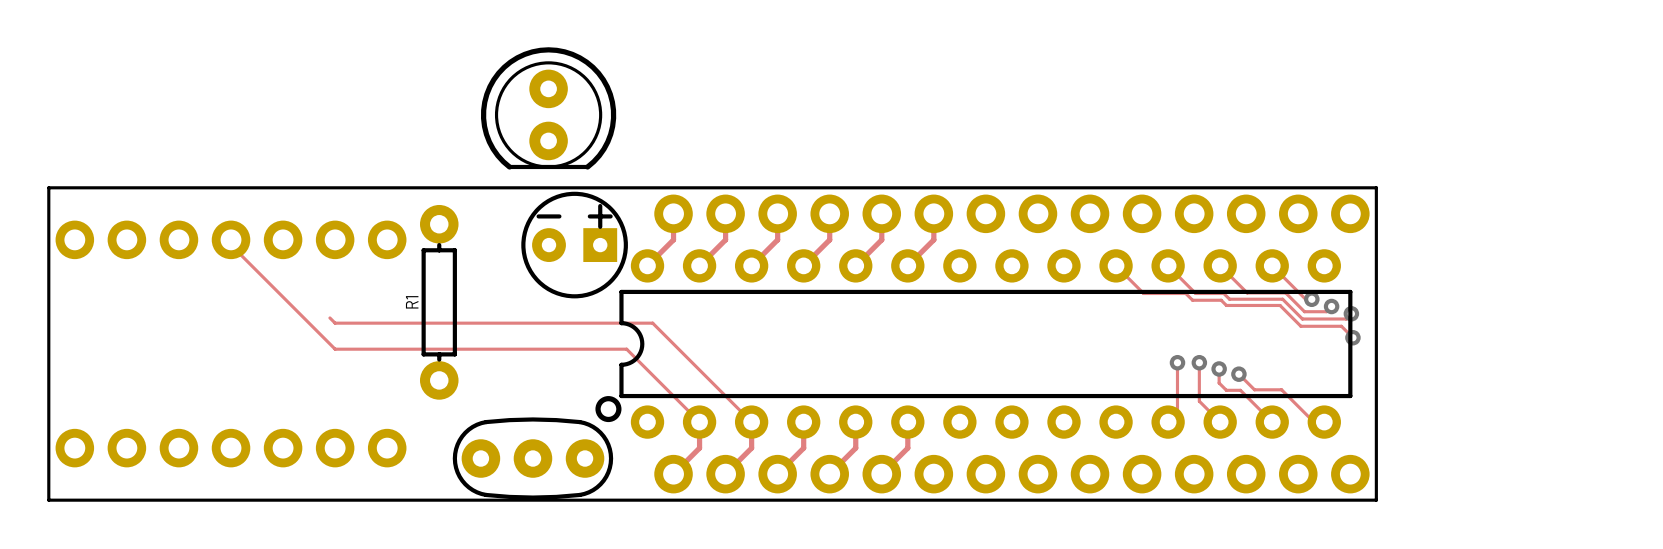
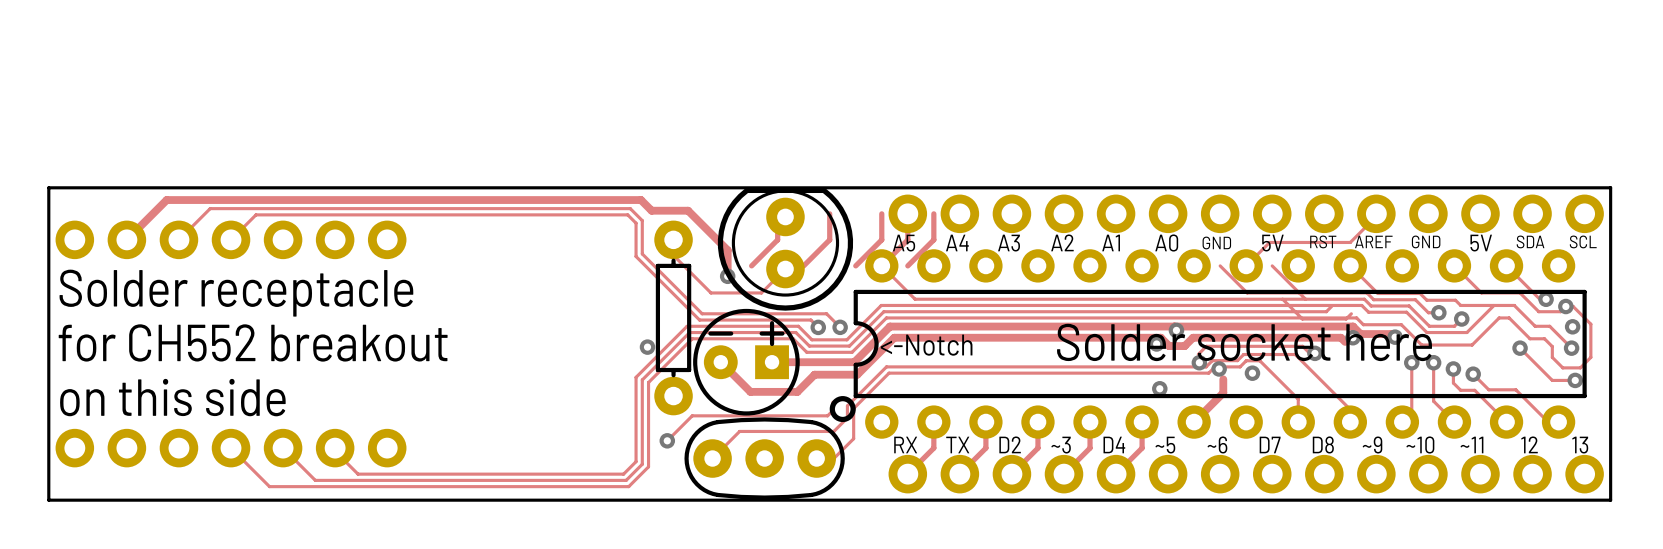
part rotation: 0° (548, 108) -> 180° (785, 249)
part position: (548, 108) -> (785, 249)
board edge: (1376, 187) (1376, 500) -> (1376, 187) (1610, 187) (1610, 500) (1376, 500)
track: (673, 213) (673, 239) (647, 265) -> (933, 422) (933, 448) (907, 474)
track: (725, 213) (725, 239) (699, 265) -> (985, 422) (985, 448) (959, 474)
part: (1011, 213) -> none
part: none -> (1246, 213)
track: none -> (1376, 213) (1376, 216) (1350, 242) (1269, 242) (1246, 265)
track: none -> (126, 239) (166, 200) (641, 200) (651, 210) (688, 210) (727, 250) (727, 276)
track: none -> (178, 239) (210, 208) (630, 208) (642, 220) (642, 253) (702, 313) (826, 313) (840, 327)
track: (231, 239) (231, 245) (335, 349) (626, 349) (699, 422) (699, 448) (673, 474) -> (231, 239) (256, 214) (627, 214) (636, 223) (636, 256) (699, 320) (810, 320) (818, 327)
track: none -> (673, 239) (673, 255) (711, 292) (761, 292) (785, 269)
text: none -> RST (1323, 241)
text: none -> AREF (1373, 241)
text: none -> GND (1426, 241)
text: none -> SDA (1530, 241)
text: none -> SCL (1583, 241)
text: none -> A4 (957, 242)
text: none -> A2 (1062, 242)
text: none -> A1 (1111, 242)
text: none -> GND (1216, 242)
text: none -> A5 (904, 243)
text: none -> A3 (1009, 243)
text: none -> A0 (1166, 243)
text: none -> 5V (1272, 243)
text: none -> 5V (1481, 243)
part position: (574, 245) -> (746, 362)
track: (1116, 265) (1143, 293) (1185, 293) (1192, 300) (1221, 300) (1226, 305) -> (335, 448) (335, 451) (358, 474) (623, 474) (636, 461) (636, 377) (687, 326) (798, 326) (811, 339) (846, 339) (881, 305) (1226, 305)
track: (1168, 265) (1195, 293) (1223, 293) (1229, 299) -> (907, 213) (907, 239) (881, 265) (915, 299) (1229, 299)
track: none -> (1350, 265) (1377, 293) (1420, 293) (1426, 300) (1455, 300) (1460, 305) (1514, 305) (1535, 326) (1549, 326) (1571, 348)
track: none -> (1454, 265) (1481, 292) (1520, 292) (1538, 311) (1560, 311) (1565, 306) (1573, 306) (1590, 324) (1590, 357) (1580, 367) (1562, 367) (1552, 357) (1552, 346) (1544, 338) (1529, 338) (1509, 317) (1499, 317) (1472, 345) (1421, 345) (1401, 324) (1363, 324) (1356, 317) (886, 317) (852, 352) (806, 352) (793, 338) (692, 338) (648, 382) (648, 466) (628, 486) (269, 486) (231, 448)
track: none -> (1506, 265) (1539, 299) (1546, 299)
via: none -> (727, 276)
track: (1285, 292) (1304, 311) -> (1285, 292) (1366, 292) (1373, 299) (1415, 299) (1428, 312) (1438, 312)
text: none -> Solder receptacle (236, 293)
track: none -> (1311, 299) (1364, 299) (1371, 305) (1409, 305) (1429, 326) (1454, 326) (1461, 319)
via: (1311, 299) -> none
via: none -> (1546, 299)
R1: (439, 302) -> none
track: (1280, 305) (1300, 326) (1341, 326) (1352, 337) -> (1280, 305) (1361, 305) (1368, 312) (1406, 312) (1426, 332) (1466, 332) (1494, 305)
via: (1331, 306) -> none
via: none -> (1565, 306)
track: none -> (1304, 311) (883, 311) (849, 346) (809, 346) (795, 332) (689, 332) (642, 379) (642, 464) (626, 480) (315, 480) (283, 448)
via: none -> (1438, 312)
via: (1351, 313) -> none
track: (329, 317) (335, 323) (652, 323) (751, 422) (751, 448) (725, 474) -> none
part: none -> (673, 317)
via: none -> (1461, 319)
via: none -> (1572, 326)
via: none -> (818, 327)
via: none -> (840, 327)
via: none -> (1176, 330)
track: none -> (1160, 337) (1169, 346) (1184, 346) (1193, 337) (1340, 337) (1345, 341)
track: none -> (1160, 337) (894, 337) (857, 374) (814, 374) (797, 391) (750, 391) (720, 362)
track: none -> (1395, 337) (1391, 334) (1360, 334) (1353, 326) (890, 326) (854, 362) (772, 362)
via: none -> (1395, 337)
text: none -> for CH552 breakout (253, 342)
text: none -> Solder socket here (1244, 342)
part position: (973, 343) -> (1208, 343)
via: none -> (1156, 343)
text: none -> <-Notch (926, 345)
via: none -> (647, 347)
track: none -> (1520, 348) (1552, 380) (1575, 380)
via: none -> (1520, 348)
via: none -> (1571, 348)
track: none -> (1314, 353) (1309, 353) (1302, 346) (1206, 346) (1198, 354)
via: none -> (1314, 353)
track: (1177, 362) (1177, 412) (1168, 422) -> (1411, 362) (1411, 412) (1402, 422)
via: (1177, 362) -> none
track: (1199, 362) (1199, 401) (1220, 422) -> (1433, 362) (1433, 401) (1454, 422)
via: none -> (1411, 362)
via: none -> (1433, 362)
track: (1219, 368) (1219, 383) (1226, 390) (1240, 390) (1272, 422) -> (1453, 368) (1453, 383) (1460, 390) (1474, 390) (1506, 422)
via: none -> (1453, 368)
track: (1238, 374) (1254, 389) (1281, 389) (1313, 422) (1324, 422) -> (1473, 374) (1488, 389) (1515, 389) (1548, 422) (1558, 422)
via position: (1238, 374) -> (1252, 373)
via: none -> (1473, 374)
track: none -> (1223, 379) (1223, 392) (1194, 422)
via: none -> (1575, 380)
via: none -> (1159, 388)
text: none -> on this side (172, 397)
track: none -> (832, 402) (832, 410) (827, 415) (692, 415) (667, 440)
track: (803, 422) (803, 448) (777, 474) -> (1037, 422) (1037, 448) (1011, 474)
track: (855, 422) (855, 448) (829, 474) -> (1090, 422) (1090, 448) (1063, 474)
track: (907, 422) (907, 448) (881, 474) -> (1142, 422) (1142, 448) (1116, 474)
track: none -> (1298, 422) (1298, 399) (1259, 360) (1246, 360) (1240, 366) (1214, 366) (1208, 373) (889, 373) (853, 408) (853, 438) (833, 458) (816, 458)
track: none -> (1350, 422) (1350, 409) (1295, 354) (1243, 354) (1237, 360) (1212, 360) (1206, 366) (886, 366) (847, 405) (847, 417) (833, 431) (739, 431) (712, 458)
via: none -> (667, 440)
text: none -> RX (905, 444)
text: none -> TX (957, 444)
text: none -> D2 (1010, 444)
text: none -> D4 (1114, 444)
text: none -> ~6 (1217, 444)
text: none -> D7 (1270, 444)
text: none -> D8 (1323, 444)
text: none -> ~11 (1471, 444)
text: none -> 12 (1529, 444)
text: none -> ~3 (1061, 445)
text: none -> ~5 (1165, 445)
text: none -> ~9 (1372, 445)
text: none -> ~10 (1420, 445)
text: none -> 13 (1580, 445)
part position: (532, 458) -> (764, 458)
part: (1011, 474) -> none
part: none -> (1246, 474)

